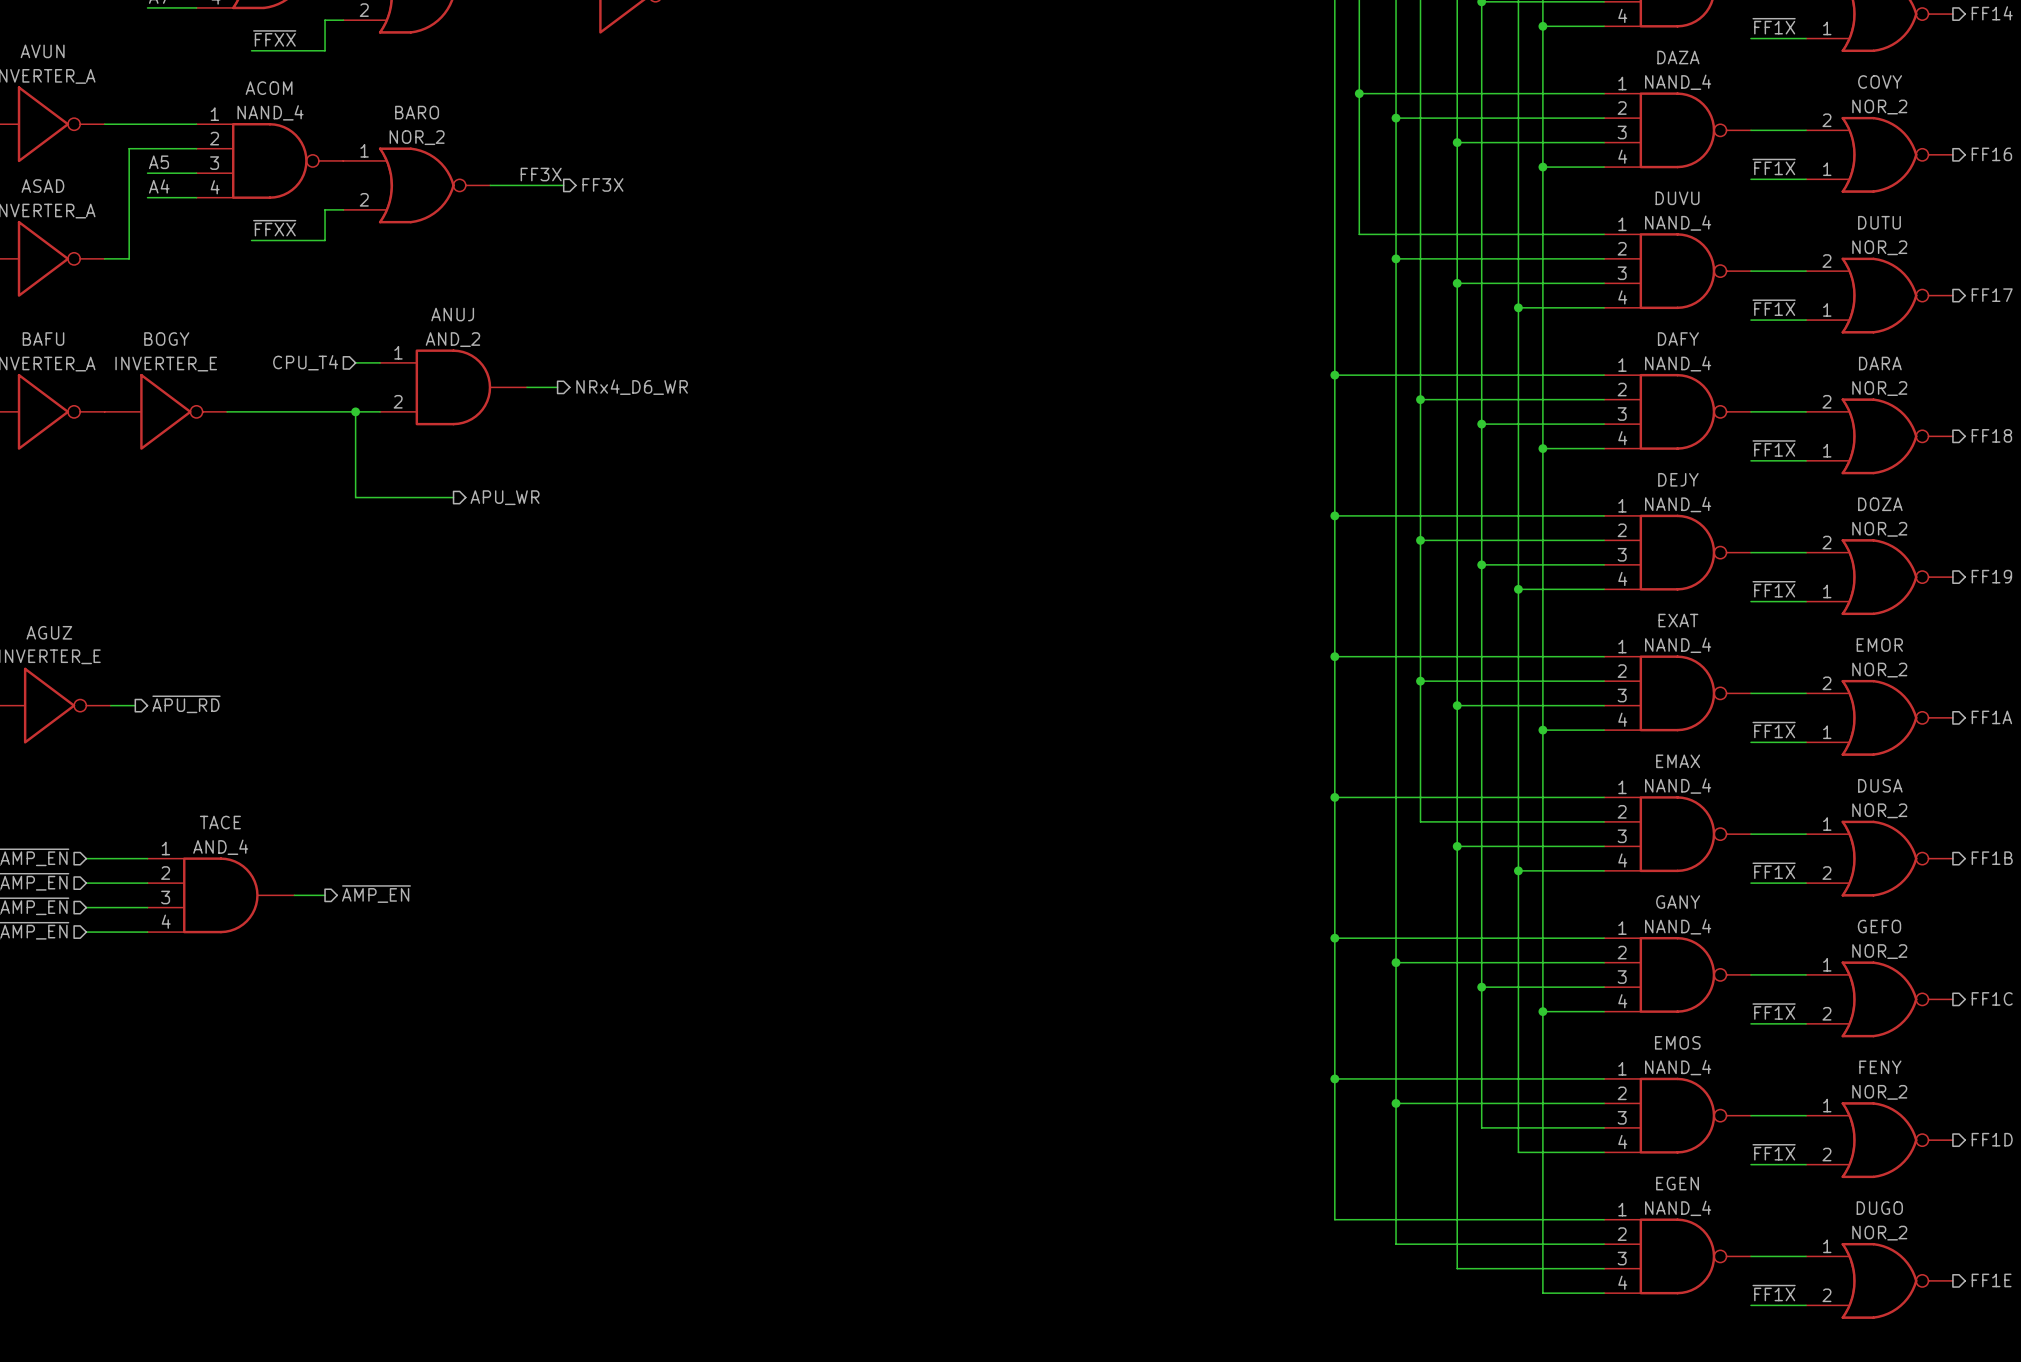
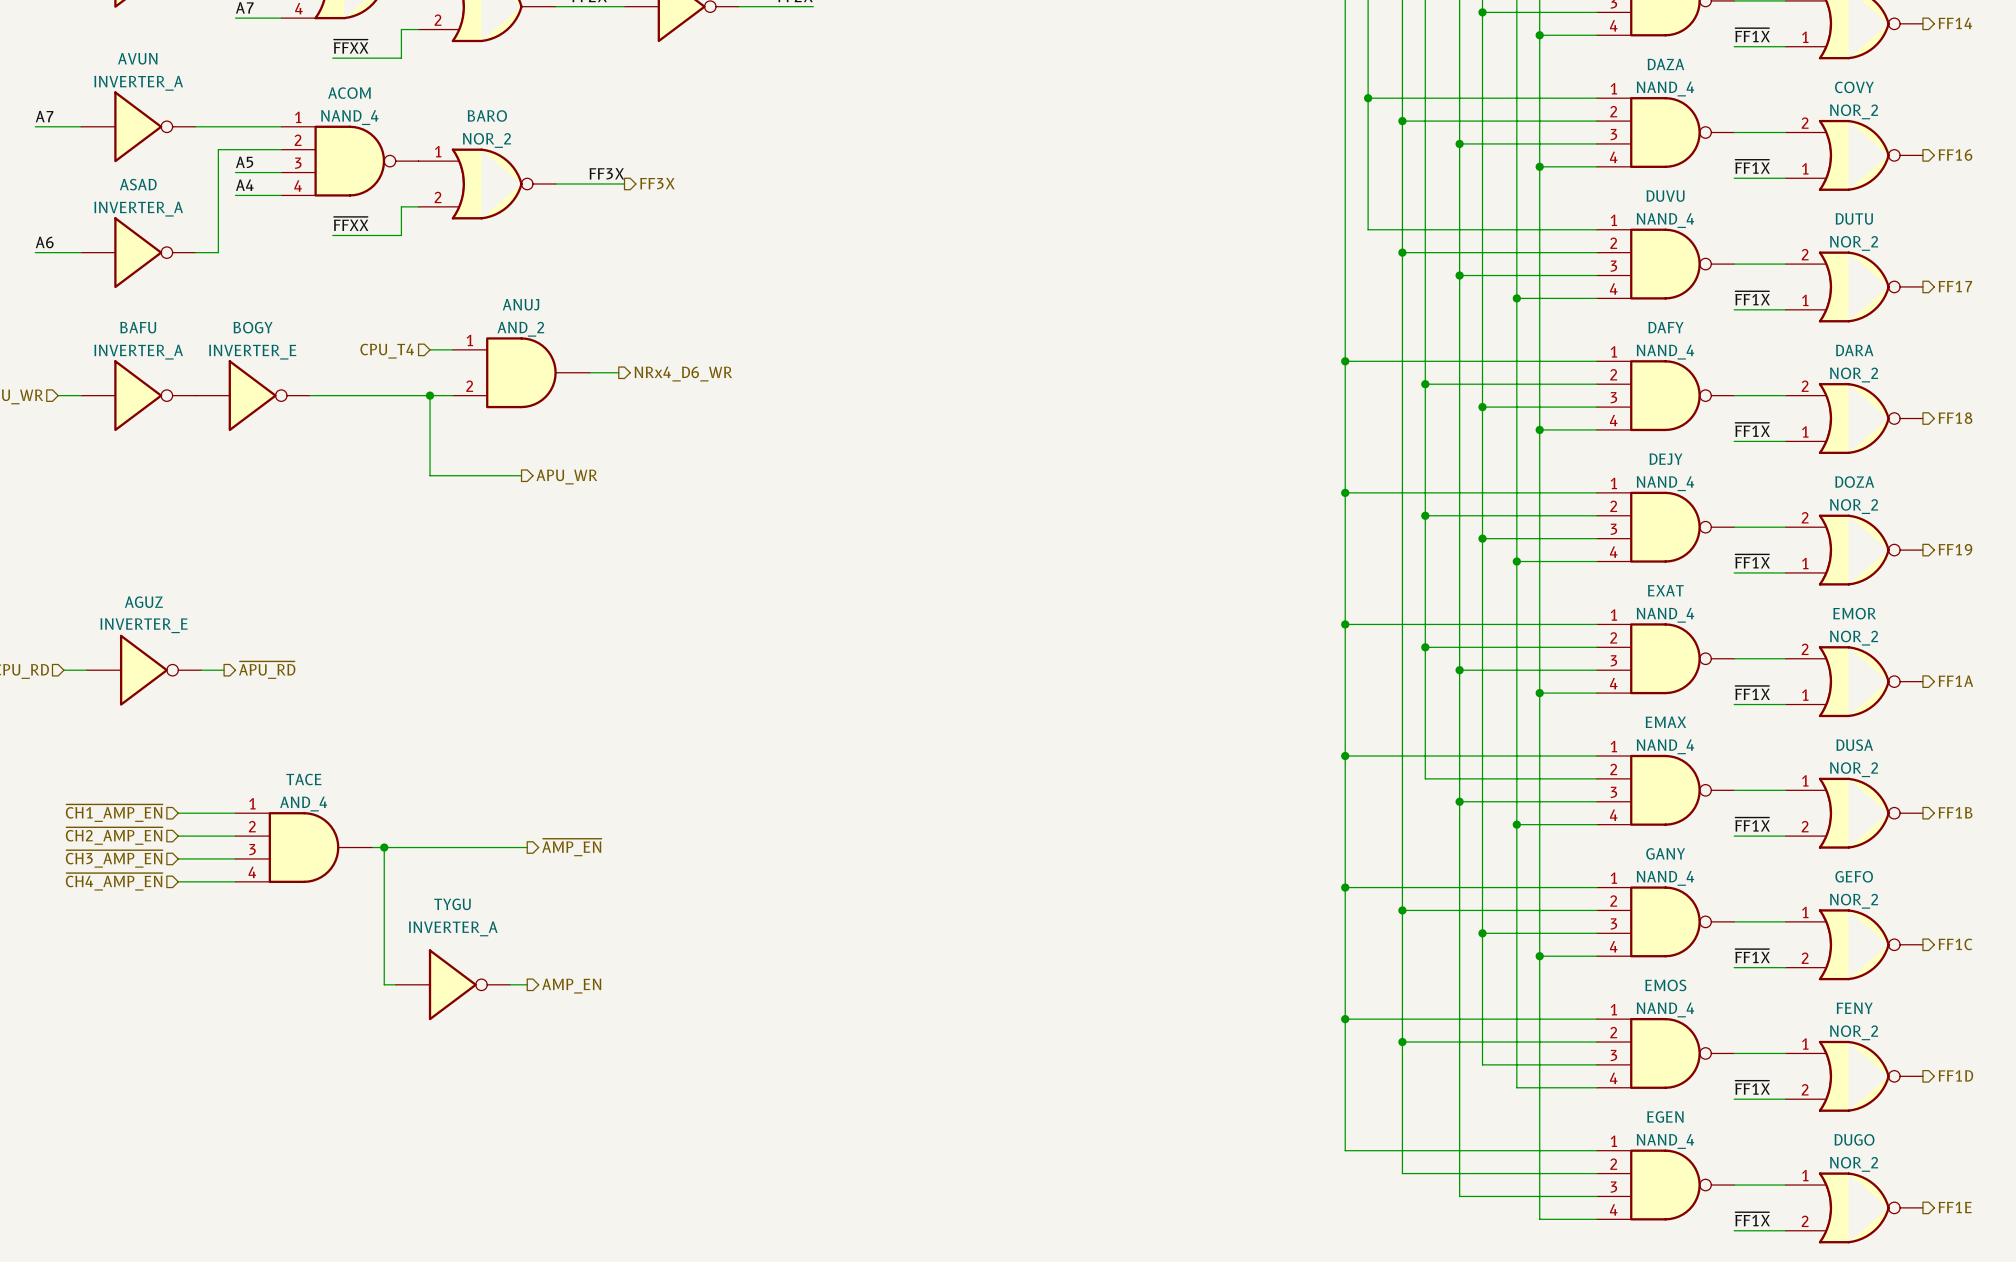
hierarchical label position: ~{AMP_EN} (376, 894) -> ~{AMP_EN} (571, 847)
wire: none -> (384, 847) (384, 984) (395, 984)
junction: none -> (384, 847)
wire: none -> (401, 847) (527, 847)
TYGU: none -> INVERTER_A (452, 984)
wire: none -> (510, 984) (527, 984)
hierarchical label: none -> AMP_EN (571, 986)

